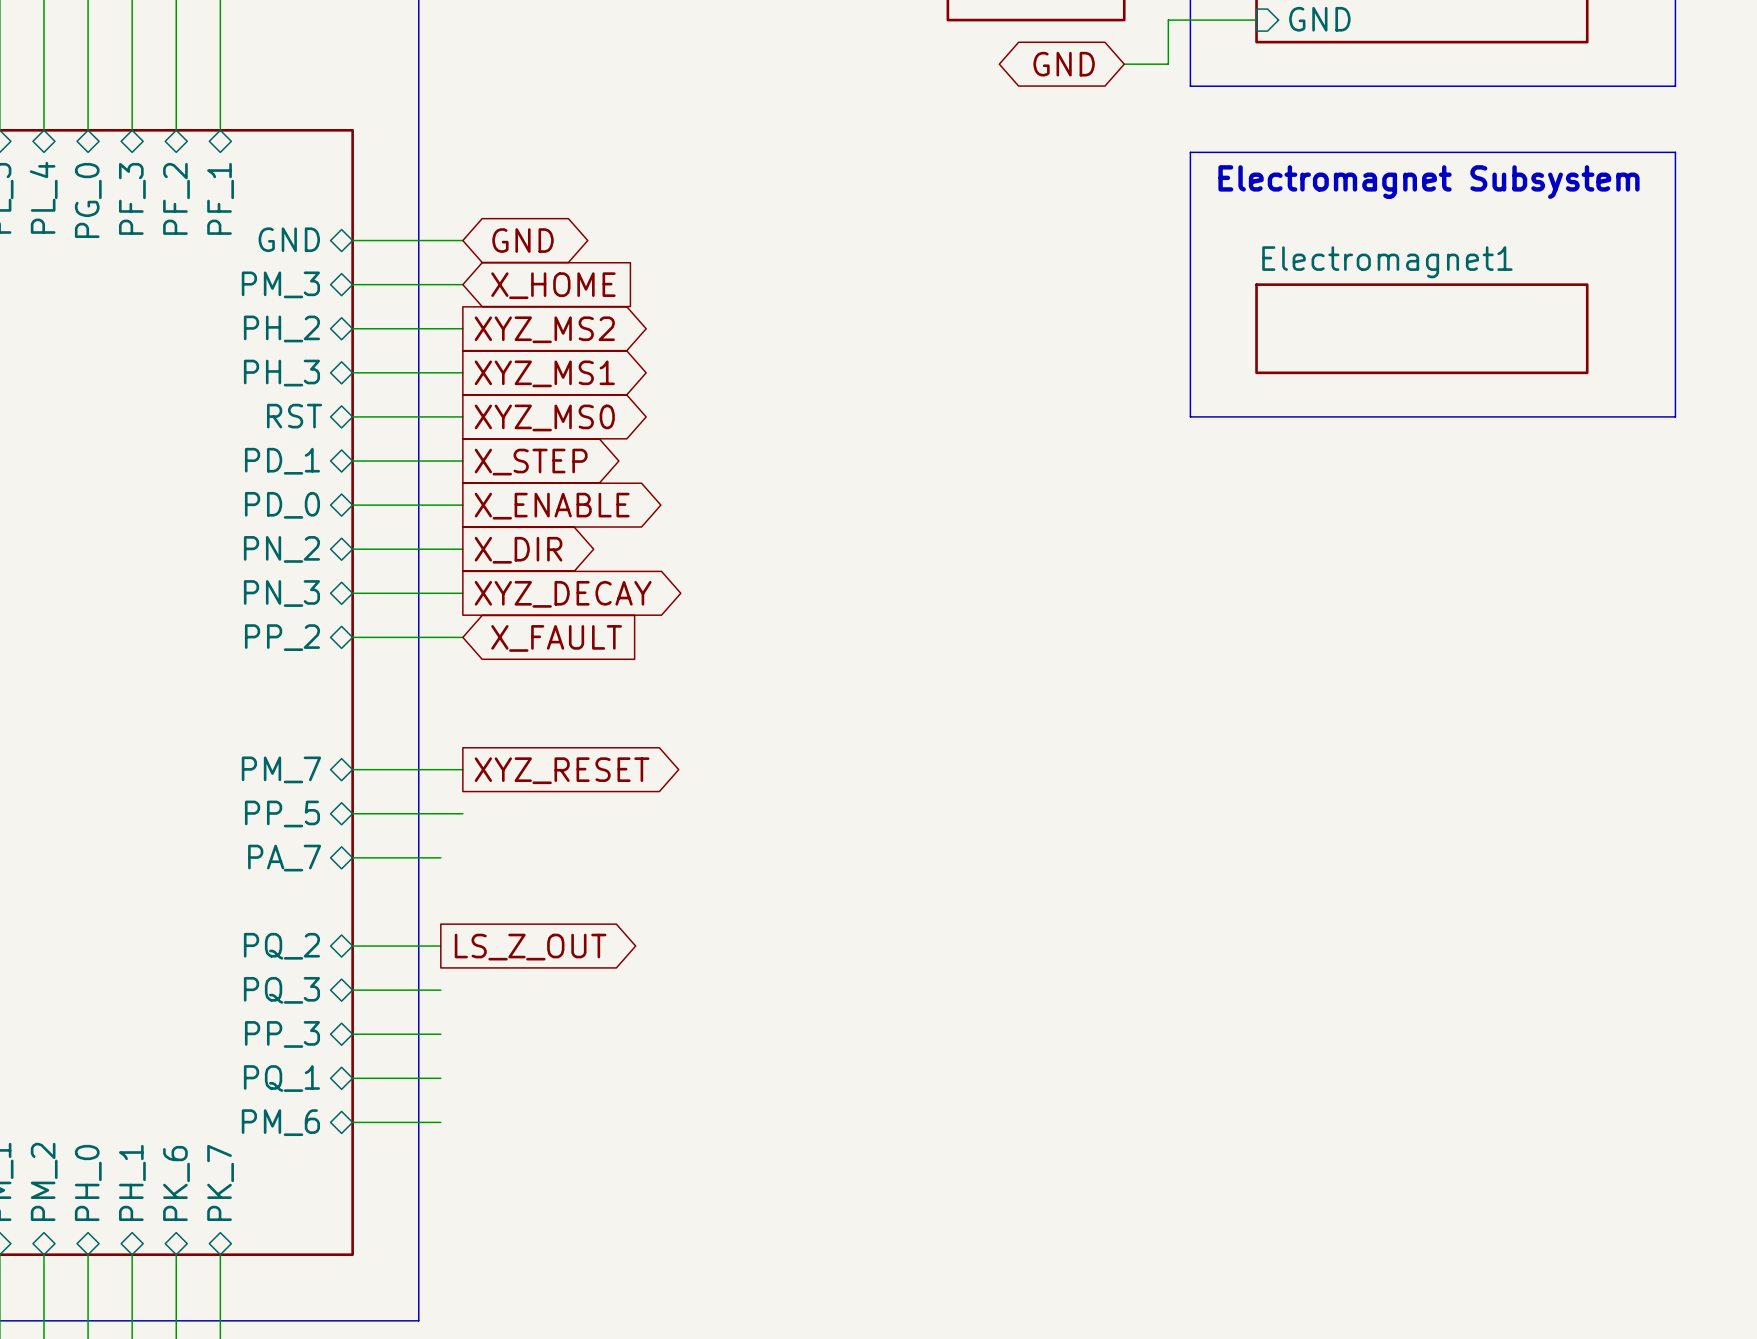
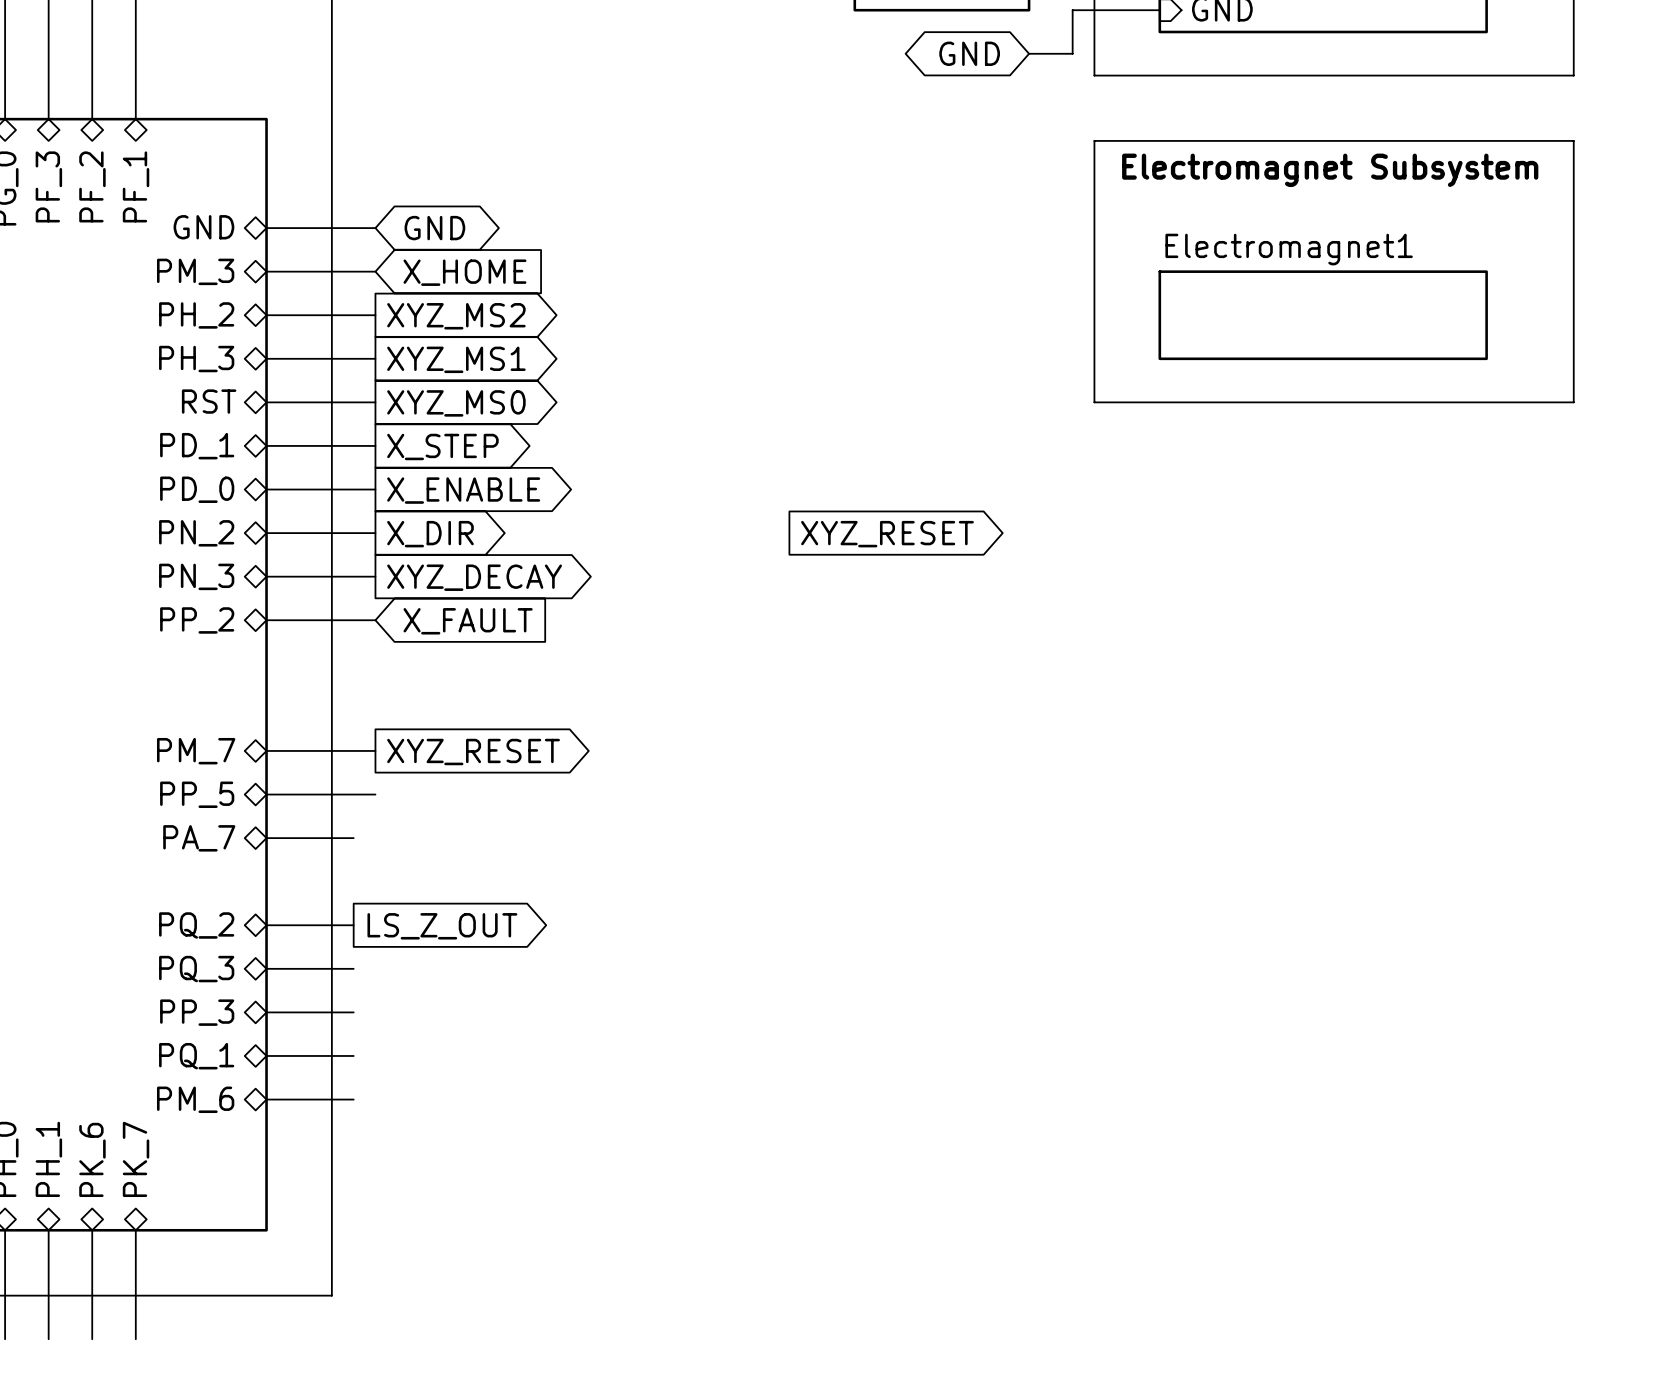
global label: none -> XYZ_RESET (887, 534)

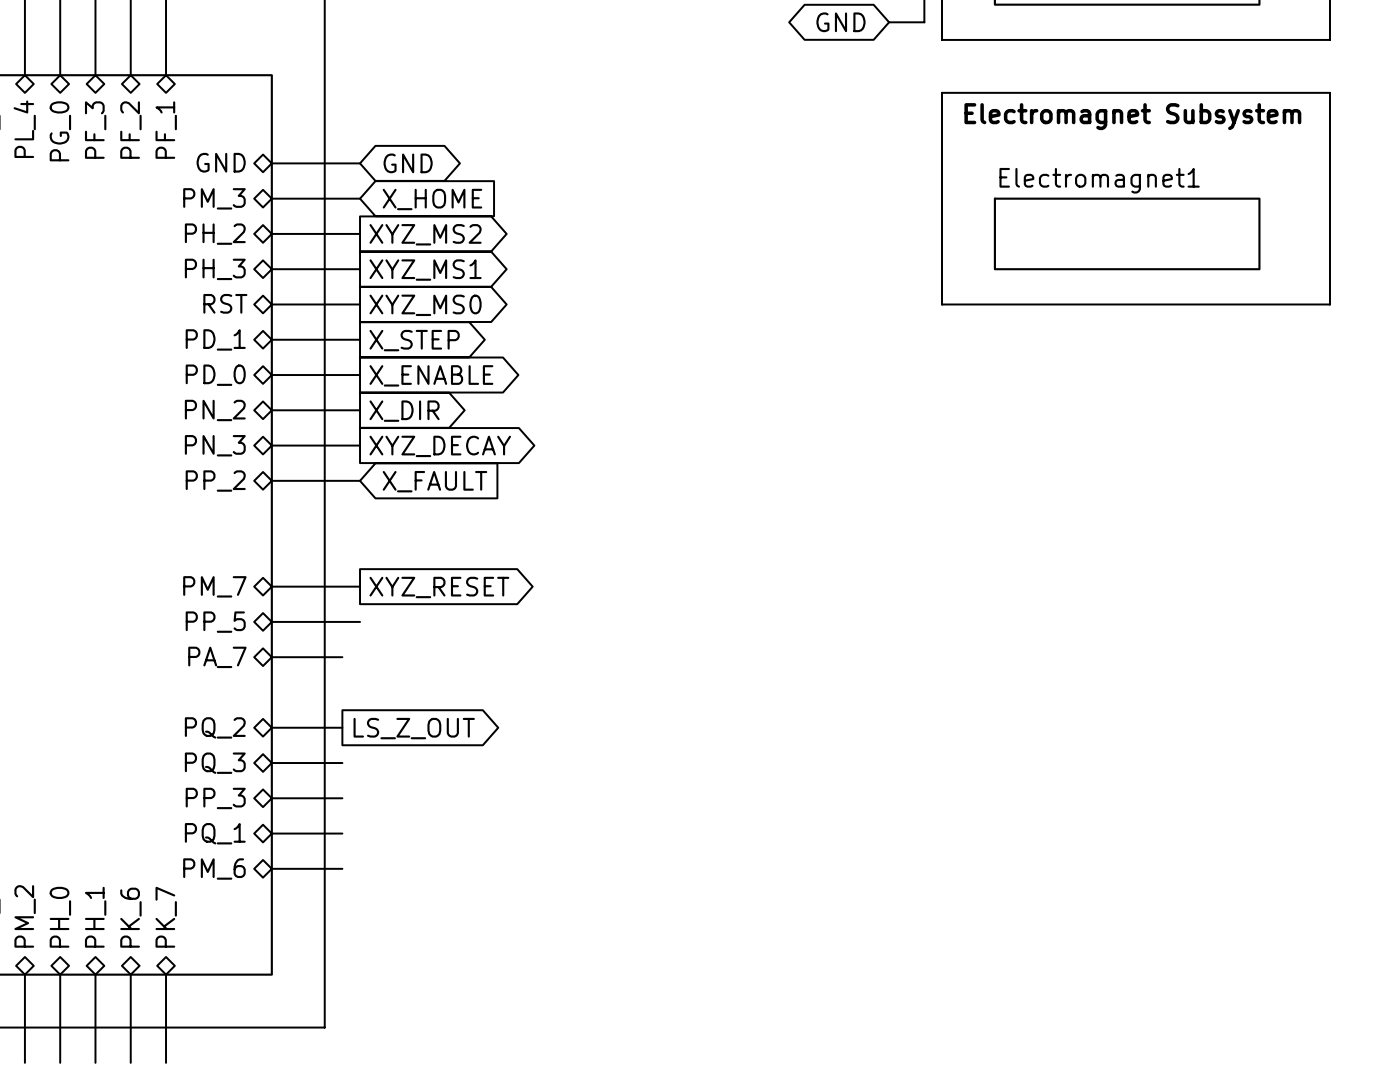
global label: XYZ_RESET (887, 534) -> none

